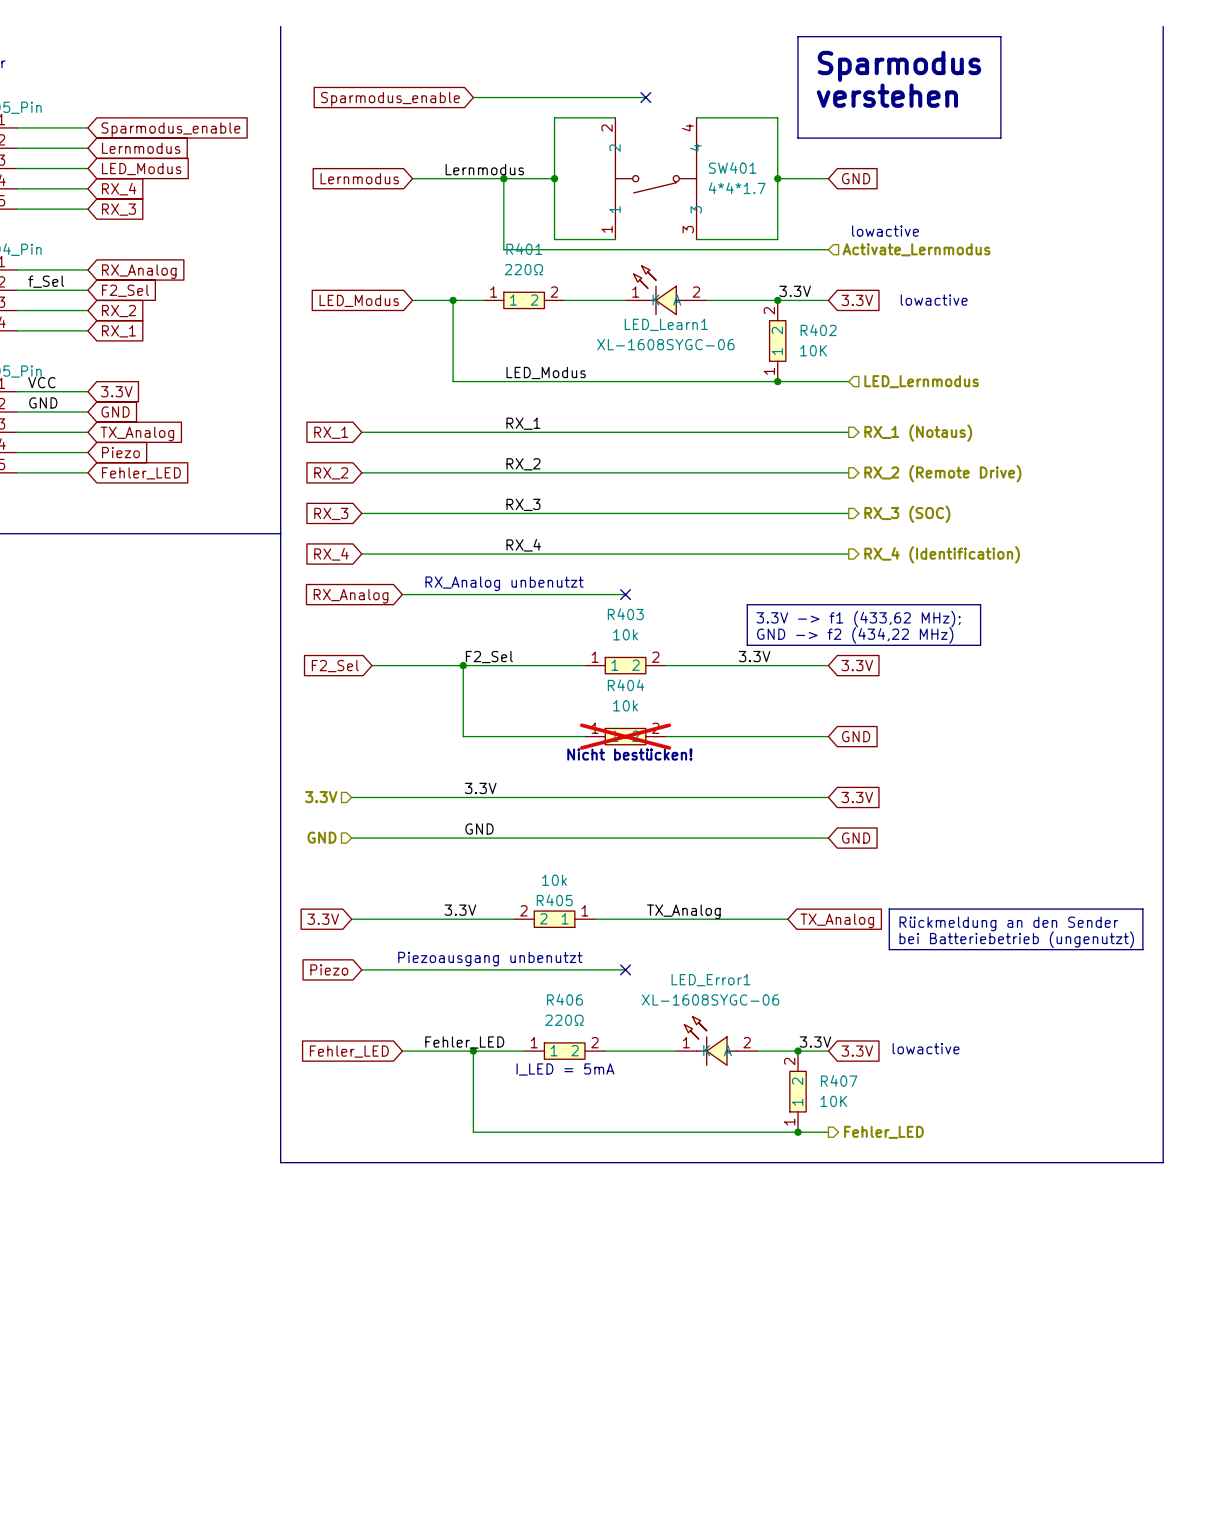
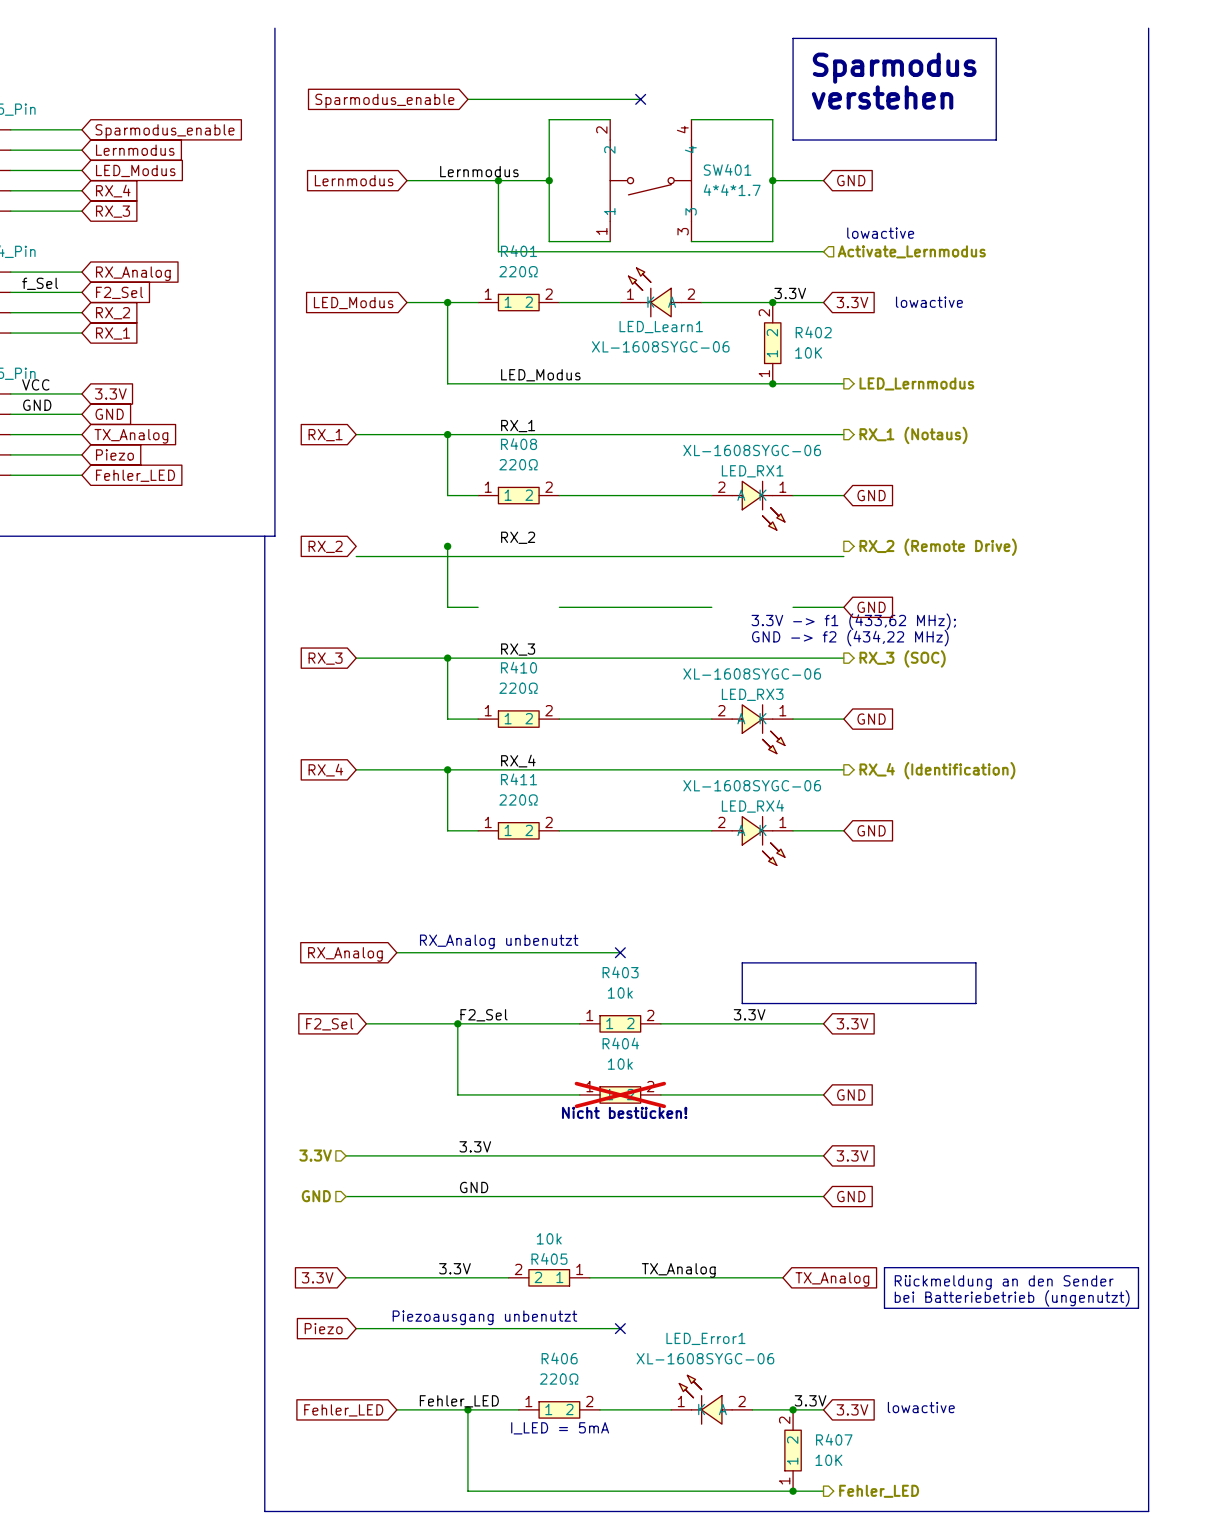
line: none -> (1148, 28) (1148, 1511) (264, 1511) (264, 536)
line: (1163, 26) (1163, 1162) (280, 1162) (280, 533) -> none
hierarchical label shape: input (921, 381) -> output (916, 383)
wire: none -> (447, 434) (447, 495) (478, 495)
junction: none -> (447, 434)
label position: RX_2 (523, 464) -> RX_2 (518, 537)
wire: (361, 472) (848, 472) -> none
global label position: RX_2 (331, 473) -> RX_2 (325, 546)
hierarchical label position: RX_2 (Remote Drive) (942, 473) -> RX_2 (Remote Drive) (938, 547)
R408: none -> 220Ω (518, 495)
wire: none -> (559, 495) (711, 495)
wire: none -> (793, 495) (843, 495)
global label: none -> GND (871, 495)
LED_RX1: none -> XL-1608SYGC-06 (752, 505)
label position: RX_3 (523, 504) -> RX_3 (518, 649)
global label position: RX_3 (331, 513) -> RX_3 (325, 658)
wire: (361, 513) (848, 513) -> (356, 658) (843, 658)
hierarchical label position: RX_3 (SOC) (907, 514) -> RX_3 (SOC) (902, 658)
wire: none -> (447, 546) (447, 607) (478, 607)
junction: none -> (447, 546)
label: RX_4 (523, 545) -> none
global label: RX_4 (331, 554) -> none
hierarchical label: RX_4 (Identification) (942, 554) -> none
text: RX_Analog unbenutzt (504, 583) -> none
wire: (402, 594) (625, 594) -> none
no-connect mark: (625, 594) -> none
global label: RX_Analog (351, 596) -> none
wire: none -> (559, 607) (711, 607)
line: (747, 604) (980, 604) (980, 645) (747, 645) (747, 604) -> none
global label: none -> GND (871, 607)
wire: none -> (447, 658) (447, 719) (478, 719)
label: 3.3V (754, 656) -> none
label: F2_Sel (489, 657) -> none
wire: (371, 665) (584, 665) -> none
wire: (463, 665) (463, 736) (584, 736) -> none
junction position: (463, 665) -> (447, 658)
R403 position: (625, 665) -> (620, 1023)
wire: (666, 665) (828, 665) -> none
global label: 3.3V (857, 665) -> none
global label: F2_Sel (335, 666) -> none
R410: none -> 220Ω (518, 719)
wire: none -> (559, 719) (711, 719)
wire: none -> (793, 719) (843, 719)
LED_RX3: none -> XL-1608SYGC-06 (752, 729)
R404 position: (625, 736) -> (620, 1094)
wire: (666, 736) (828, 736) -> none
global label position: GND (856, 736) -> GND (871, 719)
text: Nicht bestücken! (629, 754) -> none
label: none -> RX_4 (518, 761)
global label: none -> RX_4 (325, 770)
wire: none -> (356, 769) (843, 769)
wire: none -> (447, 769) (447, 830) (478, 830)
junction: none -> (447, 769)
hierarchical label: none -> RX_4 (Identification) (937, 770)
label: 3.3V (480, 788) -> none
hierarchical label: 3.3V (321, 797) -> none
wire: (351, 797) (828, 797) -> none
global label: 3.3V (857, 797) -> none
R411: none -> 220Ω (518, 830)
wire: none -> (559, 830) (711, 830)
wire: none -> (793, 830) (843, 830)
label: GND (479, 828) -> none
hierarchical label: GND (321, 837) -> none
wire: (351, 838) (828, 838) -> none
LED_RX4: none -> XL-1608SYGC-06 (752, 840)
global label position: GND (856, 838) -> GND (871, 830)
line: (889, 909) (1142, 909) (1142, 949) (889, 949) (889, 909) -> none
label: 3.3V (460, 910) -> none
label: TX_Analog (683, 911) -> none
global label: 3.3V (323, 919) -> none
wire: (351, 919) (513, 919) -> none
R405 position: (554, 919) -> (549, 1277)
wire: (595, 919) (787, 919) -> none
global label: TX_Analog (837, 920) -> none
text: Rückmeldung an den Sender (1008, 923) -> none
text: none -> RX_Analog unbenutzt (499, 941)
text: bei Batteriebetrieb (ungenutzt) (1016, 939) -> none
wire: none -> (396, 952) (620, 952)
global label: none -> RX_Analog (345, 954)
text: Piezoausgang unbenutzt (490, 959) -> none
line: none -> (742, 962) (975, 962) (975, 1003) (742, 1003) (742, 962)
global label: Piezo (329, 969) -> none
wire: (361, 969) (625, 969) -> none
no-connect mark position: (625, 969) -> (620, 952)
label: none -> F2_Sel (484, 1015)
wire: none -> (366, 1023) (579, 1023)
wire: none -> (457, 1023) (457, 1094) (579, 1094)
wire: none -> (660, 1023) (823, 1023)
global label: none -> F2_Sel (329, 1024)
LED_Error1 position: (716, 1040) -> (711, 1399)
label: Fehler_LED (464, 1042) -> none
label position: 3.3V (815, 1042) -> 3.3V (749, 1014)
text: lowactive (926, 1048) -> none
global label: Fehler_LED (349, 1051) -> none
wire: (402, 1051) (524, 1051) -> none
wire: (473, 1051) (473, 1132) (828, 1132) -> none
junction position: (473, 1051) -> (457, 1023)
R406 position: (564, 1051) -> (559, 1409)
wire: (605, 1051) (676, 1051) -> none
wire: (757, 1051) (828, 1051) -> none
junction: (798, 1051) -> none
global label position: 3.3V (857, 1051) -> 3.3V (852, 1023)
text: I_LED = 5mA (565, 1069) -> none
wire: none -> (660, 1094) (823, 1094)
R407 position: (798, 1091) -> (793, 1450)
global label: none -> GND (851, 1094)
text: none -> Nicht bestücken! (624, 1112)
junction: (798, 1132) -> none
hierarchical label: Fehler_LED (883, 1132) -> none
label: none -> 3.3V (475, 1146)
hierarchical label: none -> 3.3V (315, 1155)
wire: none -> (346, 1155) (823, 1155)
global label: none -> 3.3V (852, 1155)
label: none -> GND (474, 1187)
hierarchical label: none -> GND (316, 1196)
wire: none -> (346, 1196) (823, 1196)
global label: none -> GND (851, 1196)
line: none -> (884, 1267) (1138, 1267) (1138, 1308) (884, 1308) (884, 1267)
label: none -> 3.3V (454, 1268)
label: none -> TX_Analog (678, 1270)
global label: none -> 3.3V (317, 1277)
wire: none -> (346, 1277) (508, 1277)
wire: none -> (589, 1277) (782, 1277)
global label: none -> TX_Analog (832, 1279)
text: none -> Rückmeldung an den Sender (1004, 1282)
text: none -> bei Batteriebetrieb (ungenutzt) (1012, 1298)
text: none -> Piezoausgang unbenutzt (484, 1317)
global label: none -> Piezo (323, 1328)
wire: none -> (356, 1328) (620, 1328)
no-connect mark: none -> (620, 1328)
label: none -> Fehler_LED (459, 1401)
label: none -> 3.3V (810, 1400)
text: none -> lowactive (921, 1407)
global label: none -> Fehler_LED (343, 1410)
wire: none -> (396, 1409) (518, 1409)
wire: none -> (467, 1409) (467, 1491) (823, 1491)
junction: none -> (467, 1409)
wire: none -> (600, 1409) (671, 1409)
wire: none -> (752, 1409) (823, 1409)
junction: none -> (793, 1409)
global label: none -> 3.3V (852, 1409)
text: none -> I_LED = 5mA (560, 1428)
junction: none -> (793, 1491)
hierarchical label: none -> Fehler_LED (879, 1491)

